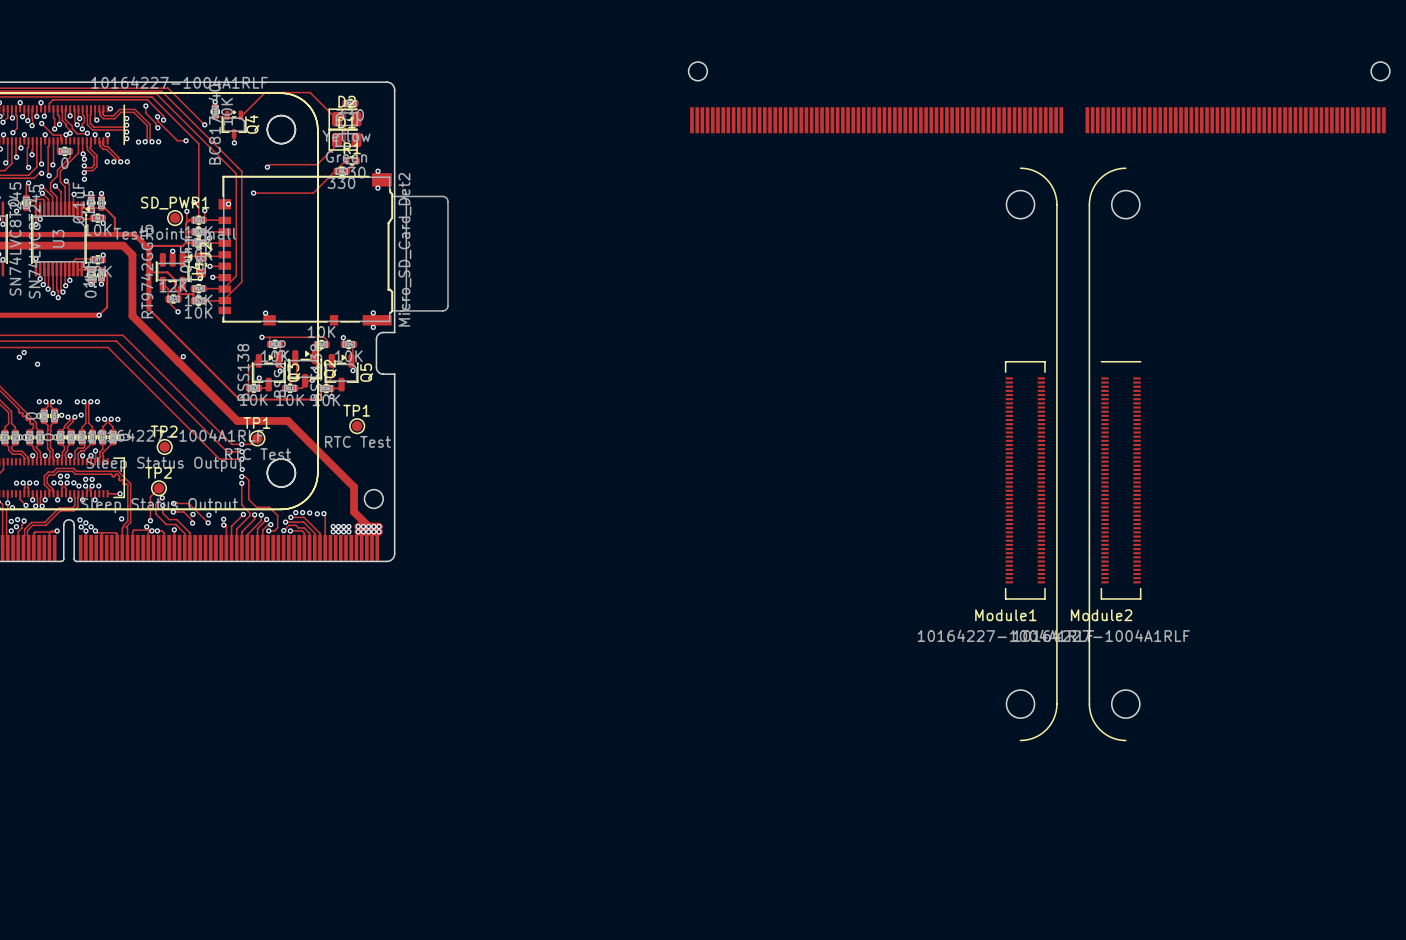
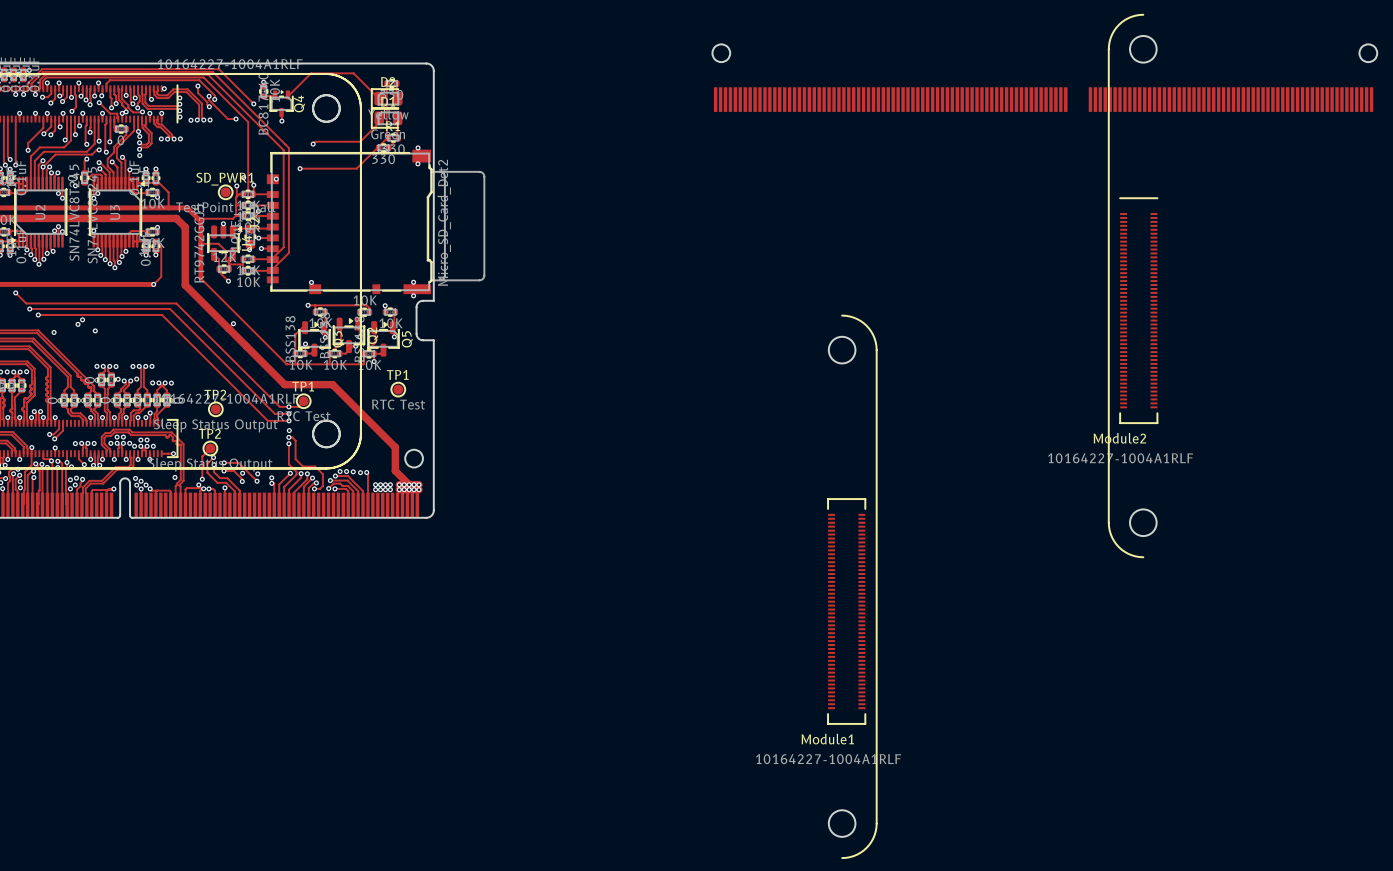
Module1 position: (1031, 454) -> (852, 586)
Module2 position: (1115, 454) -> (1133, 286)

